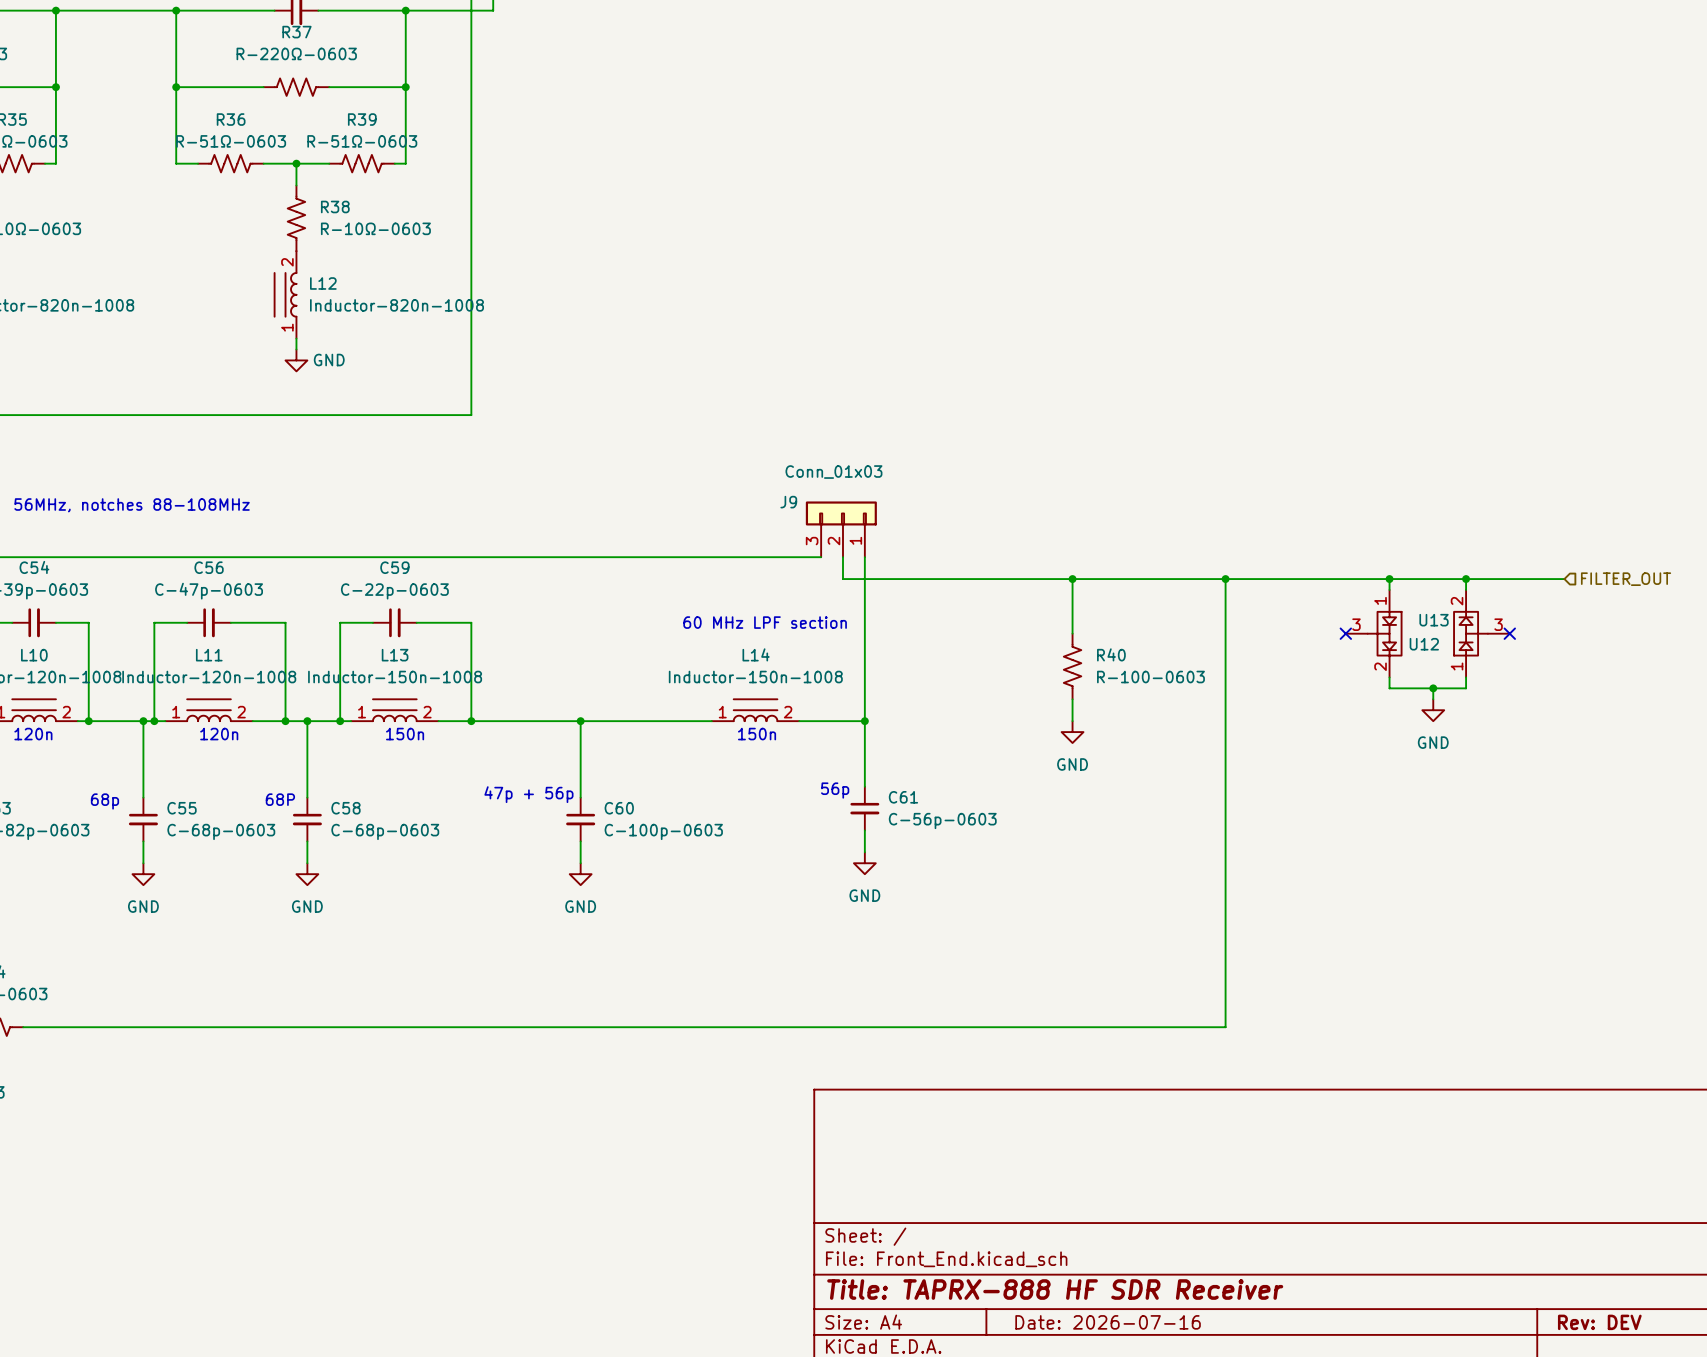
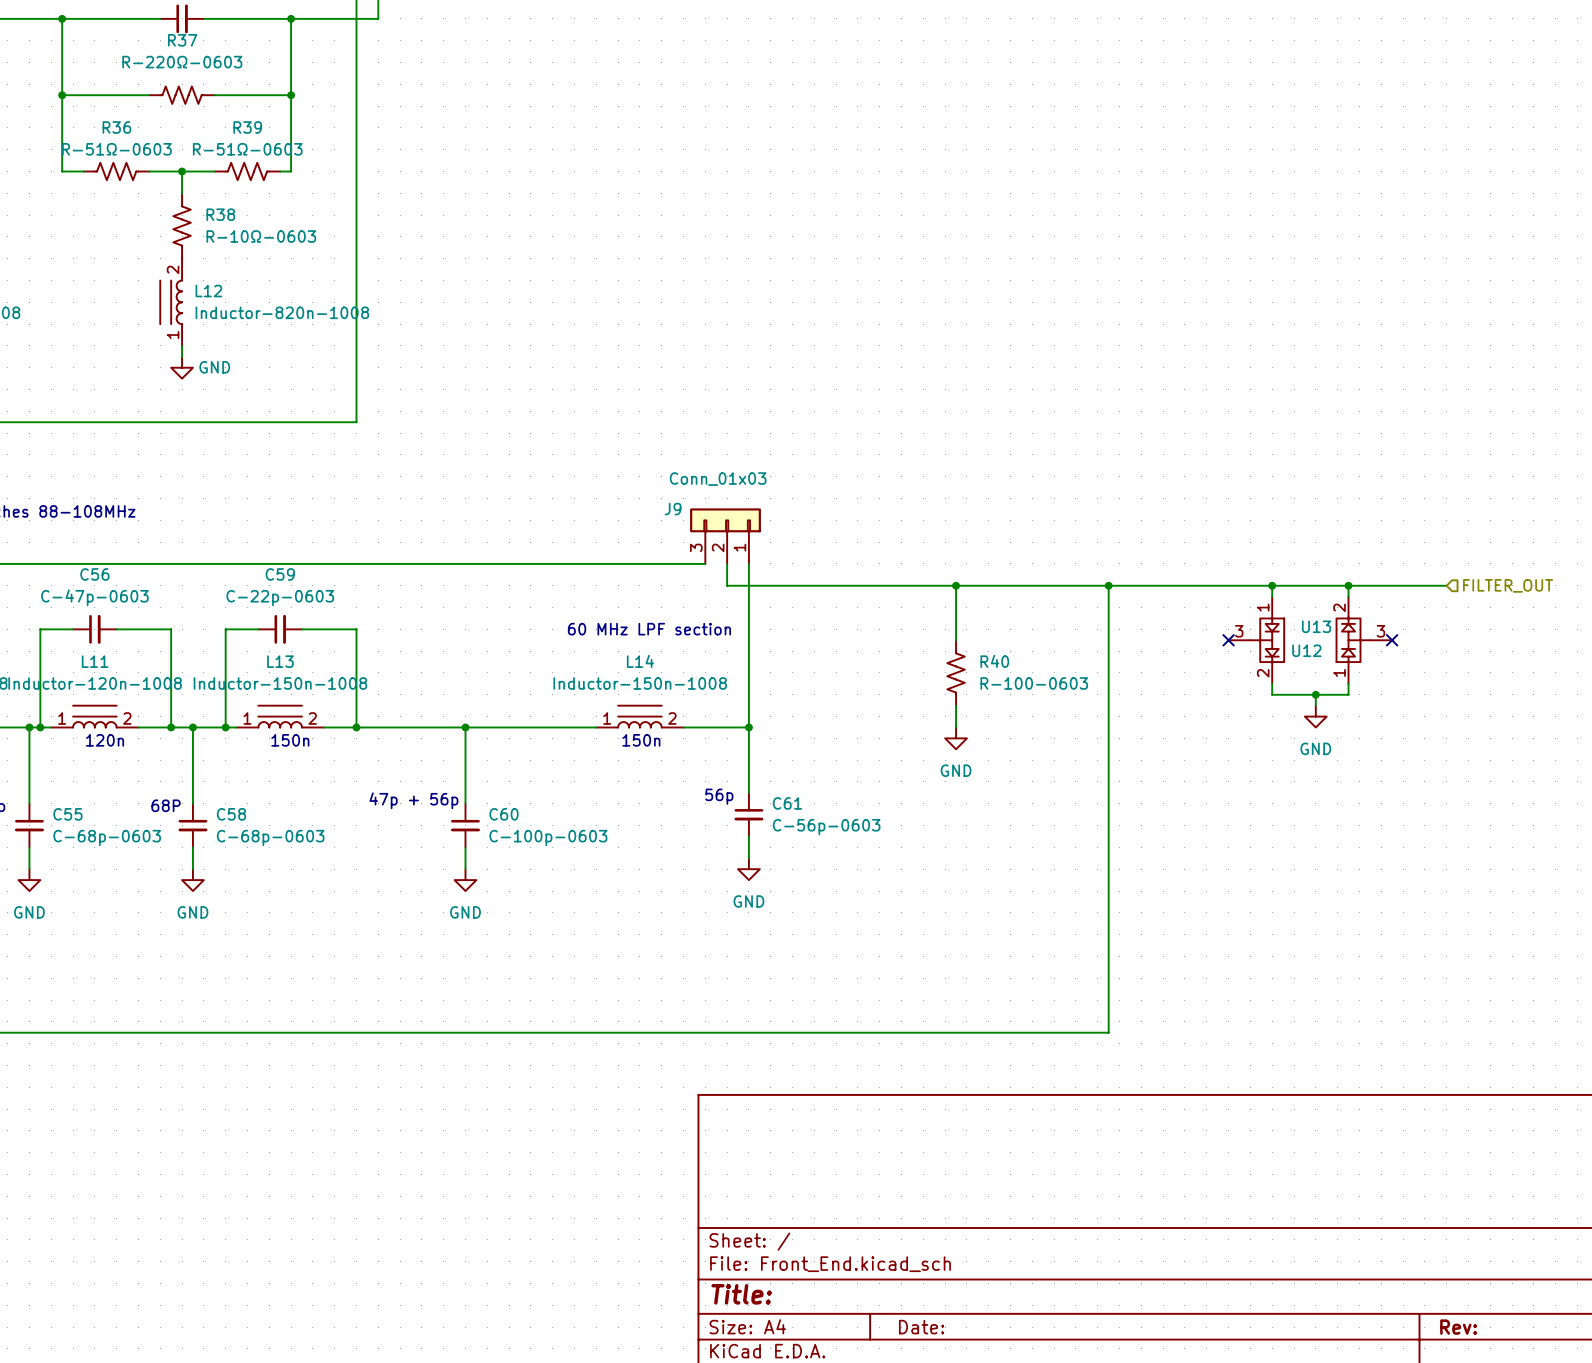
title block: Title: TAPRX-888 HF SDR Receiver (1055, 1289) -> Title: (741, 1294)
title block: Date: 2026-07-16 (1108, 1322) -> Date: (921, 1327)
title block: Rev: DEV (1599, 1322) -> Rev: (1458, 1327)

